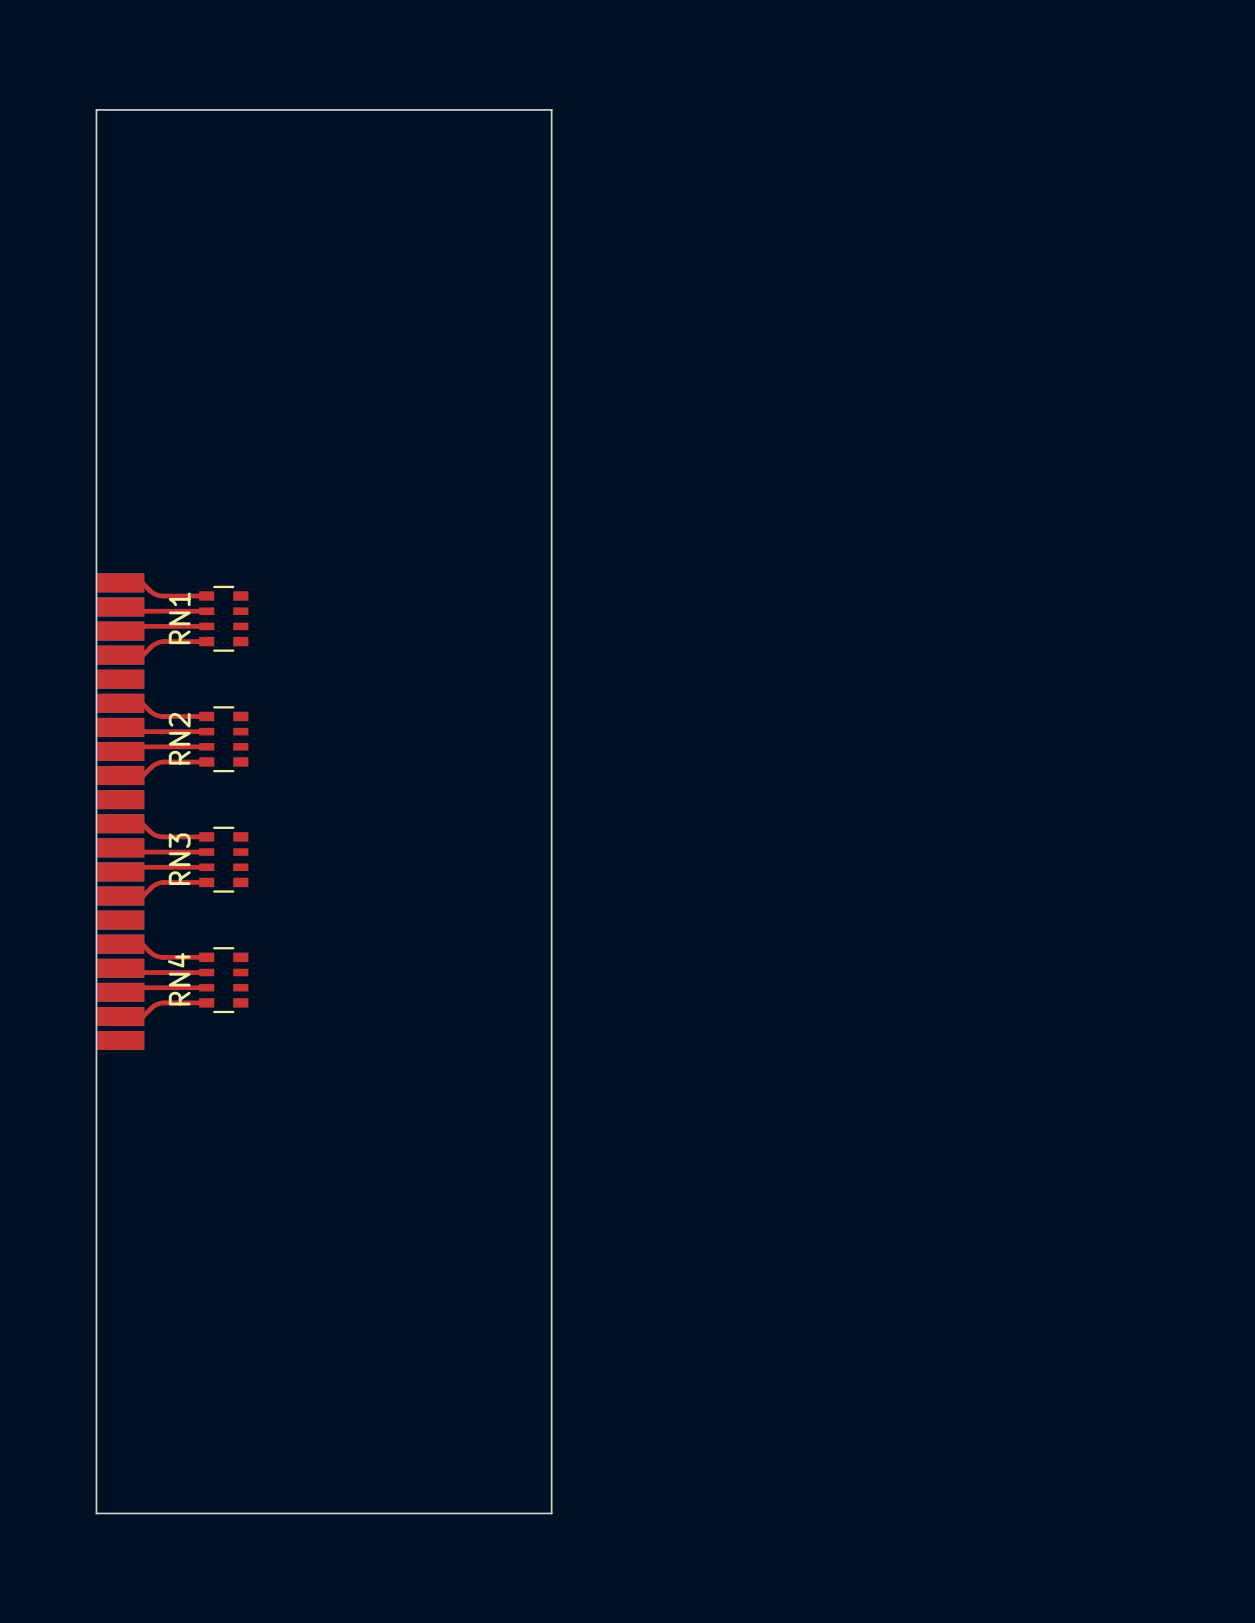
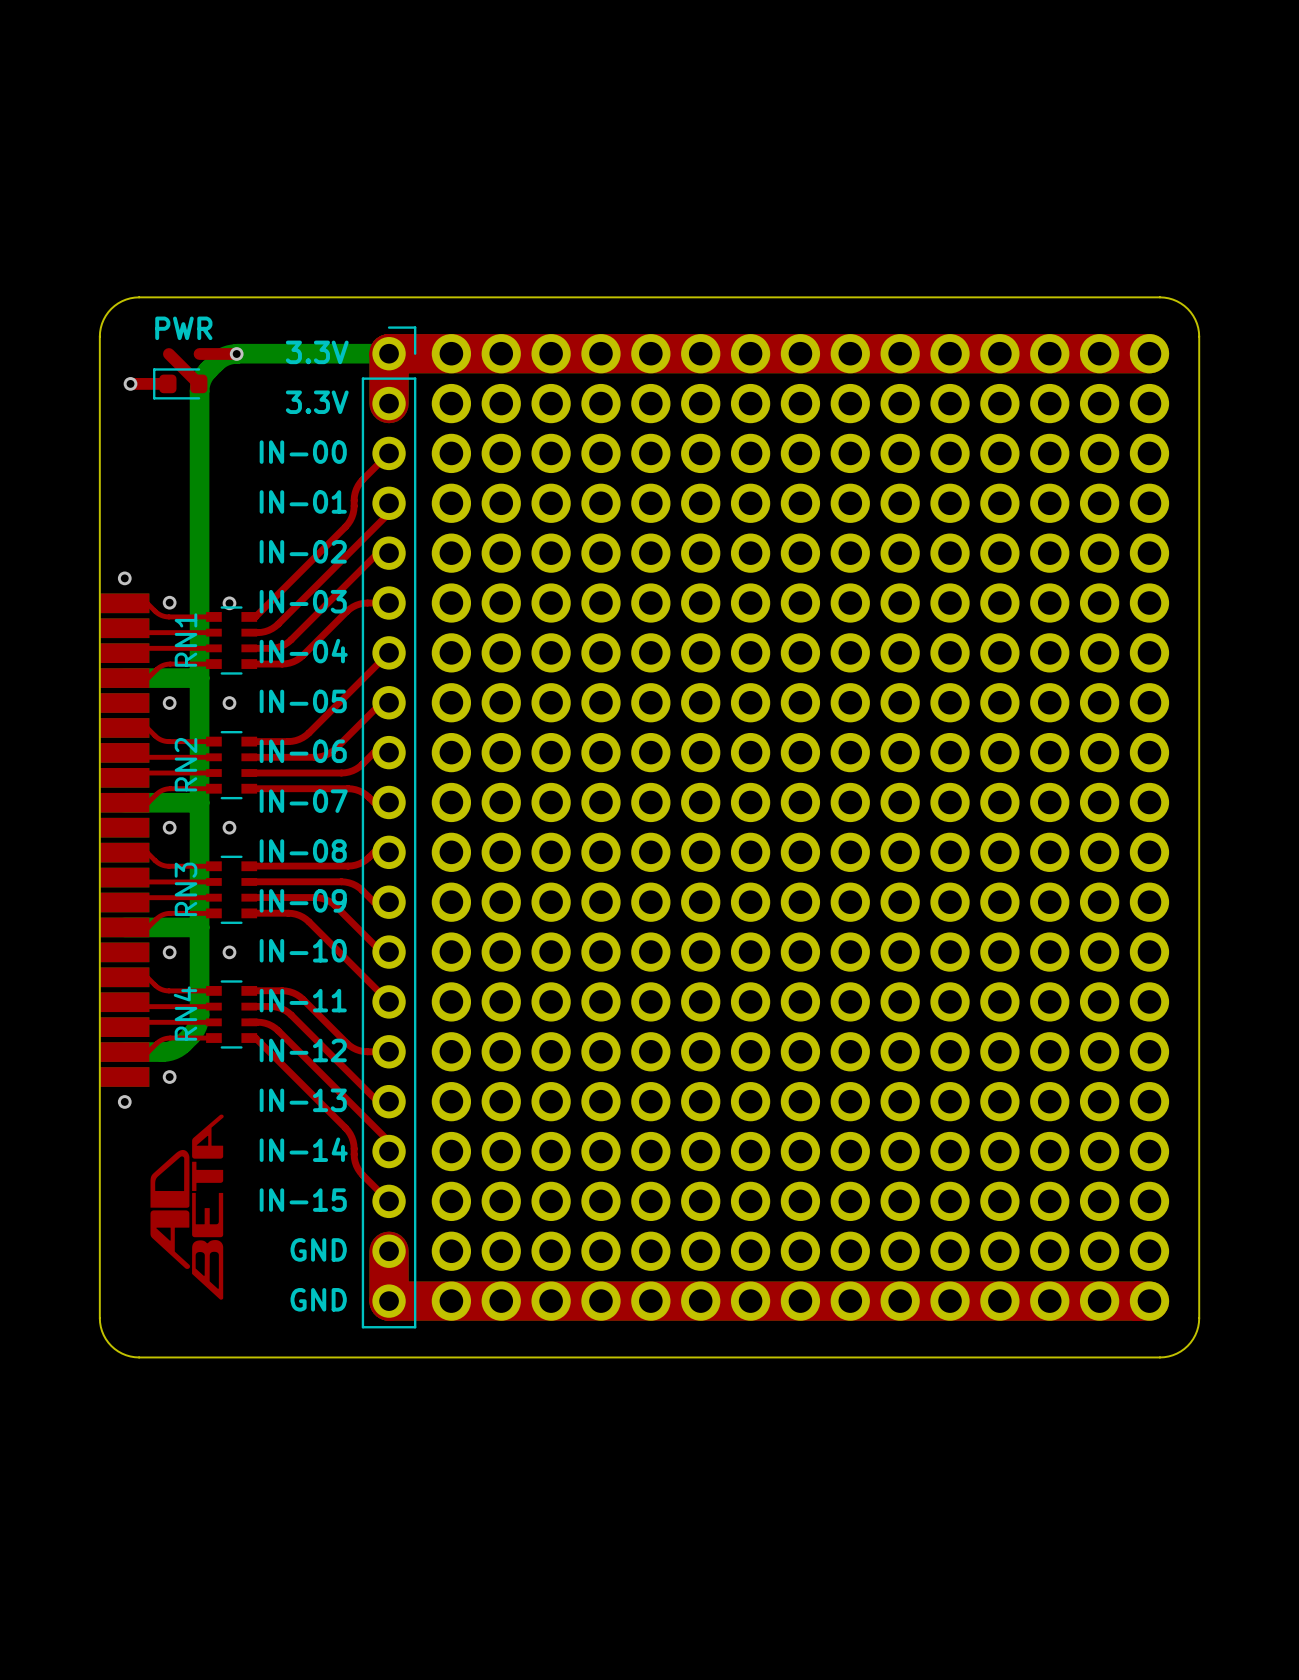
text: none -> PWR (183, 328)
board edge: (96, 325) (96, 109) (551, 109) (551, 1513) (96, 1513) (96, 1273) -> (99, 336) (102, 323) (111, 308) (126, 299) (139, 297) (1159, 297) (1172, 299) (1187, 308) (1197, 323) (1199, 336) (1199, 1318) (1195, 1335) (1184, 1348) (1172, 1355) (1159, 1357) (139, 1357) (126, 1355) (111, 1345) (102, 1331) (99, 1318)
text: none -> 3.3V (317, 352)
bottom track: none -> (389, 353) (232, 354) (218, 360) (201, 379) (199, 391) (199, 1018) (193, 1032) (173, 1049) (162, 1052) (124, 1052)
part: none -> (451, 353)
part: none -> (501, 353)
part: none -> (551, 353)
part: none -> (600, 353)
part: none -> (650, 353)
part: none -> (700, 353)
part: none -> (750, 353)
part: none -> (800, 353)
part: none -> (850, 353)
part: none -> (900, 353)
part: none -> (950, 353)
part: none -> (999, 353)
part: none -> (1049, 353)
part: none -> (1099, 353)
top track: none -> (1149, 353) (389, 353) (389, 403)
part: none -> (1149, 353)
top track: none -> (168, 353) (198, 383)
top track: none -> (199, 353) (236, 353)
via: none -> (236, 353)
top track: none -> (130, 383) (167, 383)
via: none -> (130, 383)
part: none -> (180, 383)
text: none -> 3.3V (317, 402)
part: none -> (451, 403)
part: none -> (501, 403)
part: none -> (551, 403)
part: none -> (600, 403)
part: none -> (650, 403)
part: none -> (700, 403)
part: none -> (750, 403)
part: none -> (800, 403)
part: none -> (850, 403)
part: none -> (900, 403)
part: none -> (950, 403)
part: none -> (999, 403)
part: none -> (1049, 403)
part: none -> (1099, 403)
part: none -> (1149, 403)
text: none -> IN-00 (303, 452)
top track: none -> (389, 453) (358, 485) (354, 496) (353, 513) (348, 523) (255, 616) (249, 616)
part: none -> (451, 453)
part: none -> (501, 453)
part: none -> (551, 453)
part: none -> (600, 453)
part: none -> (650, 453)
part: none -> (700, 453)
part: none -> (750, 453)
part: none -> (800, 453)
part: none -> (850, 453)
part: none -> (900, 453)
part: none -> (950, 453)
part: none -> (999, 453)
part: none -> (1049, 453)
part: none -> (1099, 453)
part: none -> (1149, 453)
text: none -> IN-01 (303, 501)
top track: none -> (389, 503) (389, 513) (278, 624) (265, 631) (249, 632)
part: none -> (451, 503)
part: none -> (501, 503)
part: none -> (551, 503)
part: none -> (600, 503)
part: none -> (650, 503)
part: none -> (700, 503)
part: none -> (750, 503)
part: none -> (800, 503)
part: none -> (850, 503)
part: none -> (900, 503)
part: none -> (950, 503)
part: none -> (999, 503)
part: none -> (1049, 503)
part: none -> (1099, 503)
part: none -> (1149, 503)
text: none -> IN-02 (303, 551)
top track: none -> (389, 553) (377, 553) (288, 642) (274, 648) (249, 648)
part: none -> (451, 553)
part: none -> (501, 553)
part: none -> (551, 553)
part: none -> (600, 553)
part: none -> (650, 553)
part: none -> (700, 553)
part: none -> (750, 553)
part: none -> (800, 553)
part: none -> (850, 553)
part: none -> (900, 553)
part: none -> (950, 553)
part: none -> (999, 553)
part: none -> (1049, 553)
part: none -> (1099, 553)
part: none -> (1149, 553)
via: none -> (124, 578)
text: none -> IN-03 (303, 601)
via: none -> (169, 602)
via: none -> (229, 603)
top track: none -> (389, 603) (363, 603) (352, 606) (302, 655) (293, 661) (282, 664) (249, 664)
part: none -> (451, 603)
part: none -> (501, 603)
part: none -> (551, 603)
part: none -> (600, 603)
part: none -> (650, 603)
part: none -> (700, 603)
part: none -> (750, 603)
part: none -> (800, 603)
part: none -> (850, 603)
part: none -> (900, 603)
part: none -> (950, 603)
part: none -> (999, 603)
part: none -> (1049, 603)
part: none -> (1099, 603)
part: none -> (1149, 603)
text: none -> IN-04 (303, 651)
top track: none -> (389, 652) (302, 737) (291, 741) (249, 741)
part: none -> (451, 652)
part: none -> (501, 652)
part: none -> (551, 652)
part: none -> (600, 652)
part: none -> (650, 652)
part: none -> (700, 652)
part: none -> (750, 652)
part: none -> (800, 652)
part: none -> (850, 652)
part: none -> (900, 652)
part: none -> (950, 652)
part: none -> (999, 652)
part: none -> (1049, 652)
part: none -> (1099, 652)
part: none -> (1149, 652)
bottom track: none -> (124, 678) (199, 678)
text: none -> IN-05 (303, 701)
top track: none -> (389, 702) (381, 702) (335, 748) (326, 755) (314, 757) (249, 757)
part: none -> (451, 702)
part: none -> (501, 702)
part: none -> (551, 702)
part: none -> (600, 702)
part: none -> (650, 702)
part: none -> (700, 702)
part: none -> (750, 702)
part: none -> (800, 702)
part: none -> (850, 702)
part: none -> (900, 702)
part: none -> (950, 702)
part: none -> (999, 702)
part: none -> (1049, 702)
part: none -> (1099, 702)
part: none -> (1149, 702)
via: none -> (169, 703)
via: none -> (229, 703)
text: none -> IN-06 (303, 751)
top track: none -> (389, 752) (374, 752) (359, 766) (345, 772) (249, 773)
part: none -> (451, 752)
part: none -> (501, 752)
part: none -> (551, 752)
part: none -> (600, 752)
part: none -> (650, 752)
part: none -> (700, 752)
part: none -> (750, 752)
part: none -> (800, 752)
part: none -> (850, 752)
part: none -> (900, 752)
part: none -> (950, 752)
part: none -> (999, 752)
part: none -> (1049, 752)
part: none -> (1099, 752)
part: none -> (1149, 752)
top track: none -> (249, 788) (351, 788) (362, 792) (374, 802) (389, 802)
text: none -> IN-07 (303, 801)
bottom track: none -> (124, 802) (199, 802)
part: none -> (451, 802)
part: none -> (501, 802)
part: none -> (551, 802)
part: none -> (600, 802)
part: none -> (650, 802)
part: none -> (700, 802)
part: none -> (750, 802)
part: none -> (800, 802)
part: none -> (850, 802)
part: none -> (900, 802)
part: none -> (950, 802)
part: none -> (999, 802)
part: none -> (1049, 802)
part: none -> (1099, 802)
part: none -> (1149, 802)
via: none -> (169, 827)
via: none -> (229, 827)
part: none -> (389, 827)
text: none -> IN-08 (303, 851)
top track: none -> (389, 852) (374, 852) (362, 862) (351, 865) (249, 866)
part: none -> (451, 852)
part: none -> (501, 852)
part: none -> (551, 852)
part: none -> (600, 852)
part: none -> (650, 852)
part: none -> (700, 852)
part: none -> (750, 852)
part: none -> (800, 852)
part: none -> (850, 852)
part: none -> (900, 852)
part: none -> (950, 852)
part: none -> (999, 852)
part: none -> (1049, 852)
part: none -> (1099, 852)
part: none -> (1149, 852)
top track: none -> (249, 881) (345, 882) (359, 887) (374, 902) (389, 902)
top track: none -> (249, 897) (314, 897) (326, 899) (335, 906) (381, 952) (389, 952)
text: none -> IN-09 (303, 900)
part: none -> (451, 902)
part: none -> (501, 902)
part: none -> (551, 902)
part: none -> (600, 902)
part: none -> (650, 902)
part: none -> (700, 902)
part: none -> (750, 902)
part: none -> (800, 902)
part: none -> (850, 902)
part: none -> (900, 902)
part: none -> (950, 902)
part: none -> (999, 902)
part: none -> (1049, 902)
part: none -> (1099, 902)
part: none -> (1149, 902)
top track: none -> (249, 913) (291, 913) (302, 917) (389, 1001)
bottom track: none -> (124, 927) (199, 927)
text: none -> IN-10 (303, 950)
part: none -> (451, 952)
part: none -> (501, 952)
part: none -> (551, 952)
part: none -> (600, 952)
part: none -> (650, 952)
part: none -> (700, 952)
part: none -> (750, 952)
part: none -> (800, 952)
part: none -> (850, 952)
part: none -> (900, 952)
part: none -> (950, 952)
part: none -> (999, 952)
part: none -> (1049, 952)
part: none -> (1099, 952)
part: none -> (1149, 952)
via: none -> (169, 952)
via: none -> (229, 952)
top track: none -> (249, 990) (282, 990) (293, 993) (302, 999) (352, 1047) (363, 1051) (389, 1051)
text: none -> IN-11 (303, 1000)
part: none -> (451, 1001)
part: none -> (501, 1001)
part: none -> (551, 1001)
part: none -> (600, 1001)
part: none -> (650, 1001)
part: none -> (700, 1001)
part: none -> (750, 1001)
part: none -> (800, 1001)
part: none -> (850, 1001)
part: none -> (900, 1001)
part: none -> (950, 1001)
part: none -> (999, 1001)
part: none -> (1049, 1001)
part: none -> (1099, 1001)
part: none -> (1149, 1001)
top track: none -> (249, 1006) (274, 1006) (288, 1012) (377, 1101) (389, 1101)
top track: none -> (249, 1022) (265, 1023) (278, 1030) (389, 1141) (389, 1151)
top track: none -> (249, 1037) (255, 1037) (348, 1130) (353, 1141) (354, 1158) (358, 1169) (389, 1201)
text: none -> IN-12 (303, 1050)
part: none -> (451, 1051)
part: none -> (501, 1051)
part: none -> (551, 1051)
part: none -> (600, 1051)
part: none -> (650, 1051)
part: none -> (700, 1051)
part: none -> (750, 1051)
part: none -> (800, 1051)
part: none -> (850, 1051)
part: none -> (900, 1051)
part: none -> (950, 1051)
part: none -> (999, 1051)
part: none -> (1049, 1051)
part: none -> (1099, 1051)
part: none -> (1149, 1051)
via: none -> (169, 1077)
text: none -> IN-13 (303, 1100)
via: none -> (124, 1101)
part: none -> (451, 1101)
part: none -> (501, 1101)
part: none -> (551, 1101)
part: none -> (600, 1101)
part: none -> (650, 1101)
part: none -> (700, 1101)
part: none -> (750, 1101)
part: none -> (800, 1101)
part: none -> (850, 1101)
part: none -> (900, 1101)
part: none -> (950, 1101)
part: none -> (999, 1101)
part: none -> (1049, 1101)
part: none -> (1099, 1101)
part: none -> (1149, 1101)
drawing: none -> [150, 1114, 224, 1300]
text: none -> IN-14 (303, 1149)
part: none -> (451, 1151)
part: none -> (501, 1151)
part: none -> (551, 1151)
part: none -> (600, 1151)
part: none -> (650, 1151)
part: none -> (700, 1151)
part: none -> (750, 1151)
part: none -> (800, 1151)
part: none -> (850, 1151)
part: none -> (900, 1151)
part: none -> (950, 1151)
part: none -> (999, 1151)
part: none -> (1049, 1151)
part: none -> (1099, 1151)
part: none -> (1149, 1151)
text: none -> IN-15 (303, 1200)
part: none -> (451, 1201)
part: none -> (501, 1201)
part: none -> (551, 1201)
part: none -> (600, 1201)
part: none -> (650, 1201)
part: none -> (700, 1201)
part: none -> (750, 1201)
part: none -> (800, 1201)
part: none -> (850, 1201)
part: none -> (900, 1201)
part: none -> (950, 1201)
part: none -> (999, 1201)
part: none -> (1049, 1201)
part: none -> (1099, 1201)
part: none -> (1149, 1201)
text: none -> GND (318, 1249)
top track: none -> (389, 1251) (389, 1301) (1149, 1301)
part: none -> (451, 1251)
part: none -> (501, 1251)
part: none -> (551, 1251)
part: none -> (600, 1251)
part: none -> (650, 1251)
part: none -> (700, 1251)
part: none -> (750, 1251)
part: none -> (800, 1251)
part: none -> (850, 1251)
part: none -> (900, 1251)
part: none -> (950, 1251)
part: none -> (999, 1251)
part: none -> (1049, 1251)
part: none -> (1099, 1251)
part: none -> (1149, 1251)
text: none -> GND (318, 1299)
part: none -> (451, 1301)
part: none -> (501, 1301)
part: none -> (551, 1301)
part: none -> (600, 1301)
part: none -> (650, 1301)
part: none -> (700, 1301)
part: none -> (750, 1301)
part: none -> (800, 1301)
part: none -> (850, 1301)
part: none -> (900, 1301)
part: none -> (950, 1301)
part: none -> (999, 1301)
part: none -> (1049, 1301)
part: none -> (1099, 1301)
part: none -> (1149, 1301)

